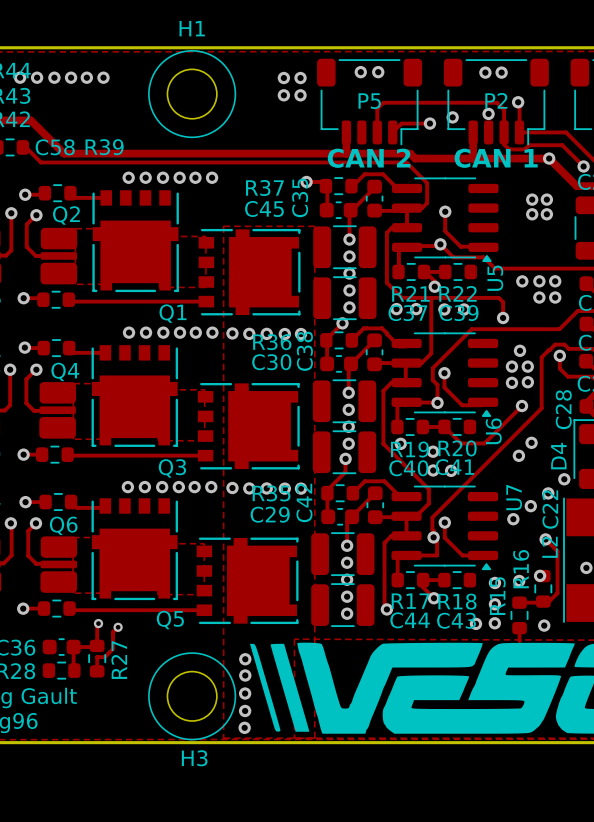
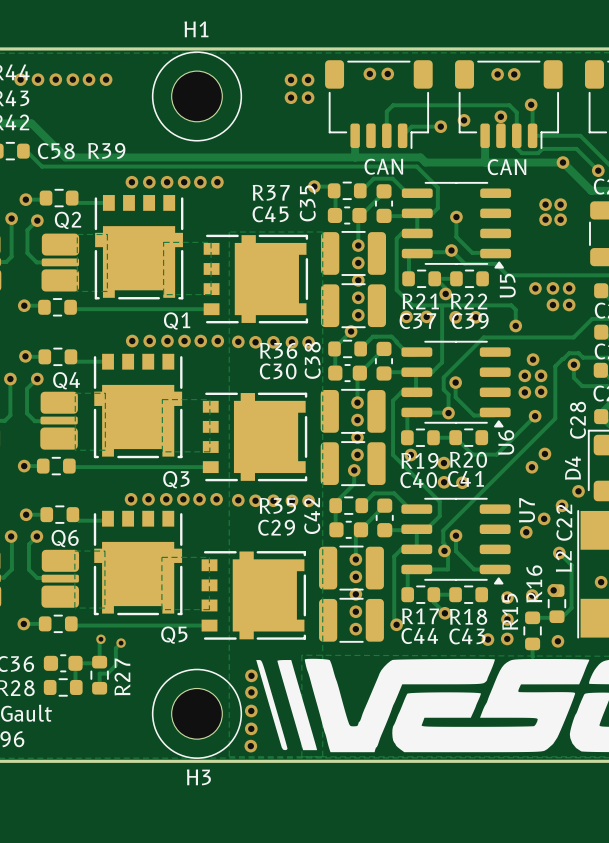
P2 name: P2 (496, 100) -> CAN (506, 167)
P5 name: P5 (369, 101) -> CAN (383, 166)
P5 text: CAN 2 (369, 158) -> none
P2 text: CAN 1 (496, 158) -> none

